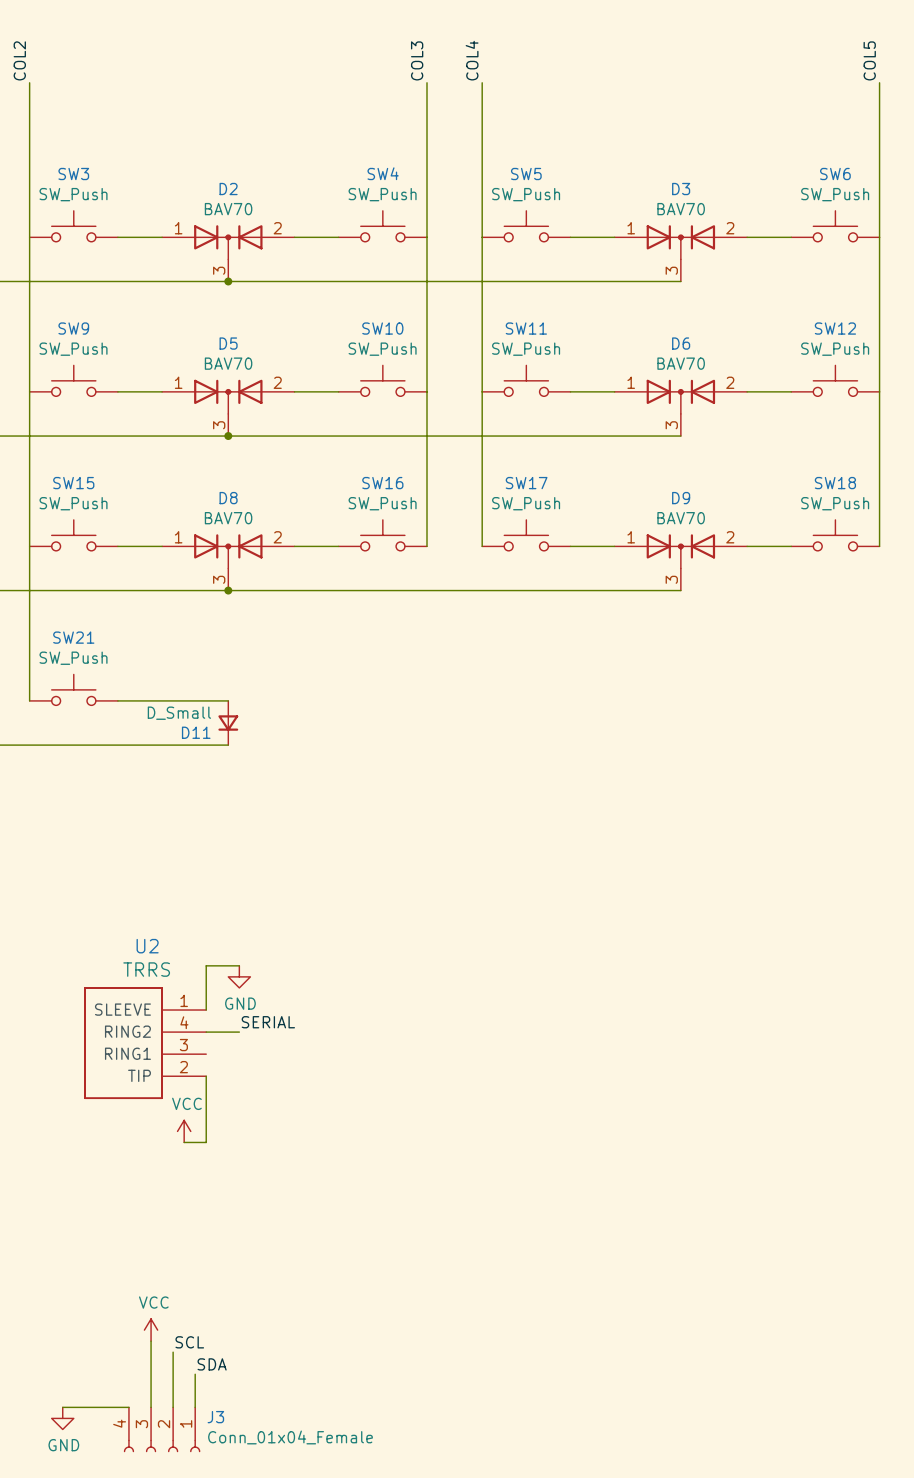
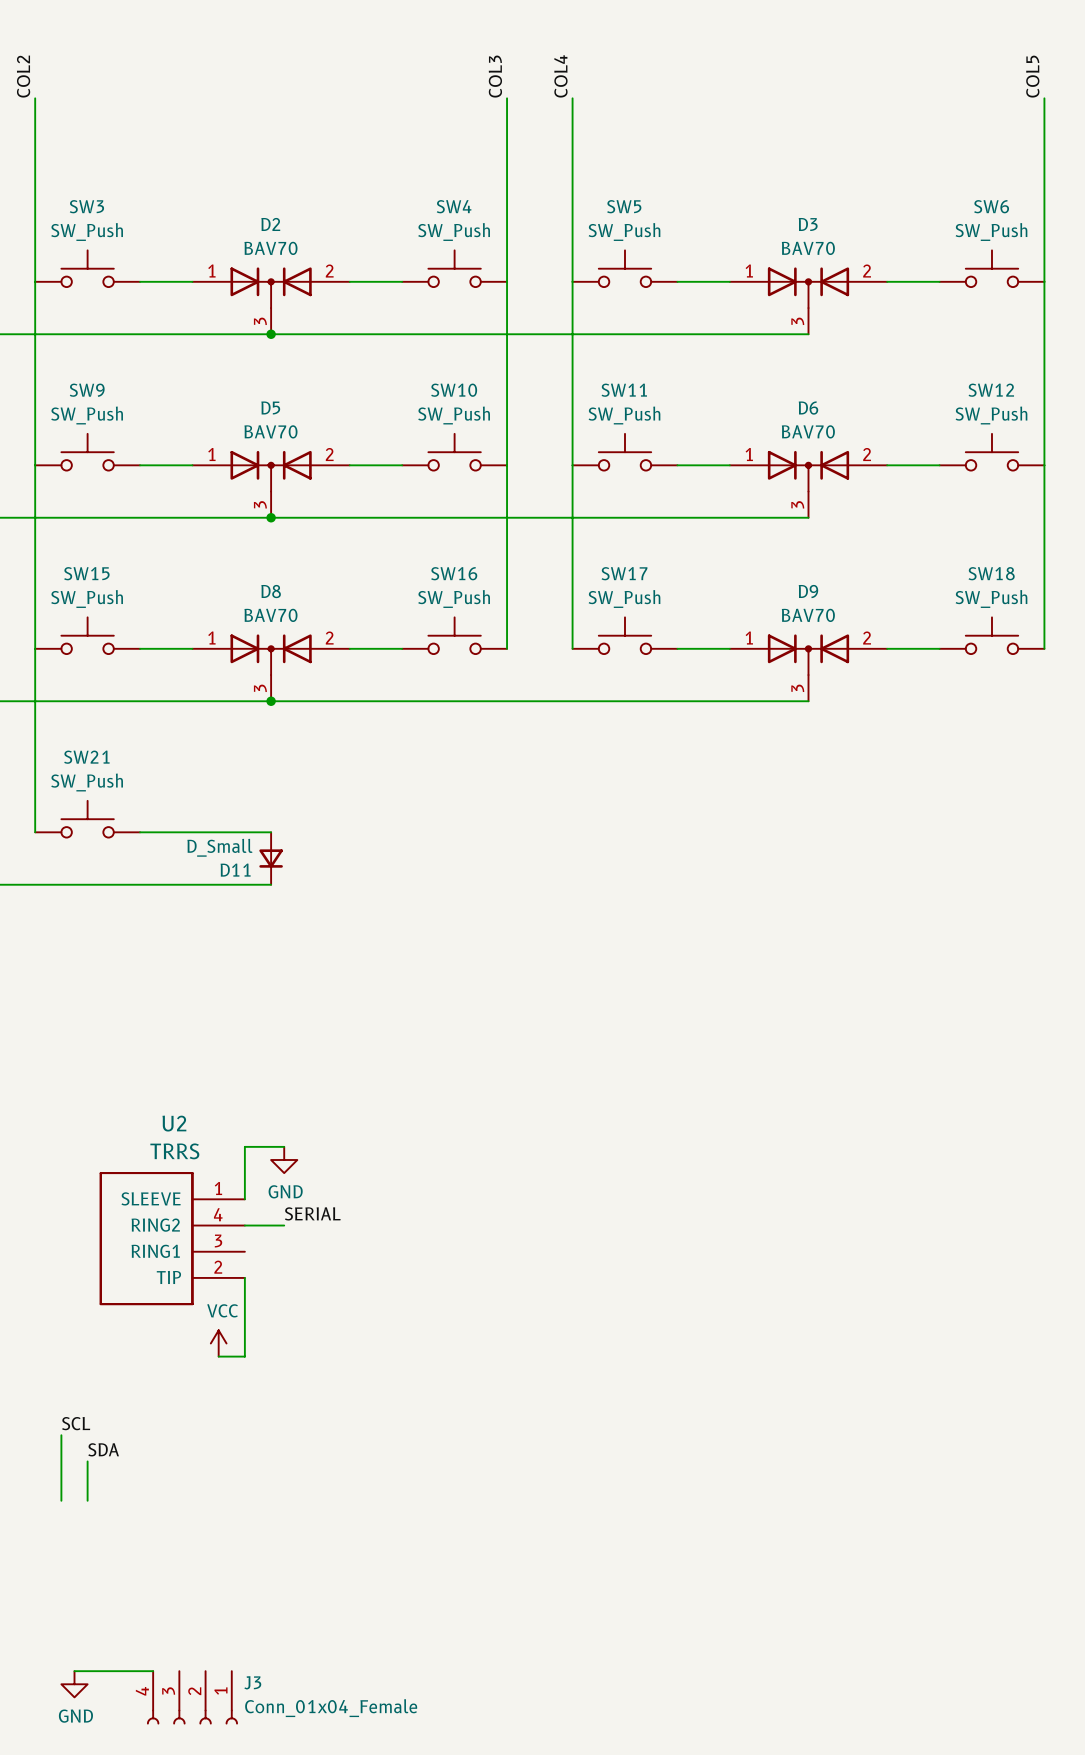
power symbol: VCC (151, 1330) -> none
wire: (151, 1341) (151, 1407) -> none
label position: SCL (189, 1342) -> SCL (76, 1423)
wire: (173, 1352) (173, 1407) -> (61, 1435) (61, 1500)
label position: SDA (212, 1364) -> SDA (103, 1449)
wire: (195, 1374) (195, 1407) -> (87, 1461) (87, 1500)

